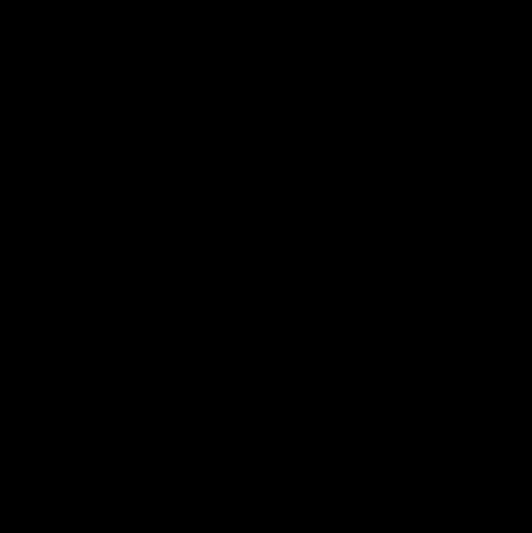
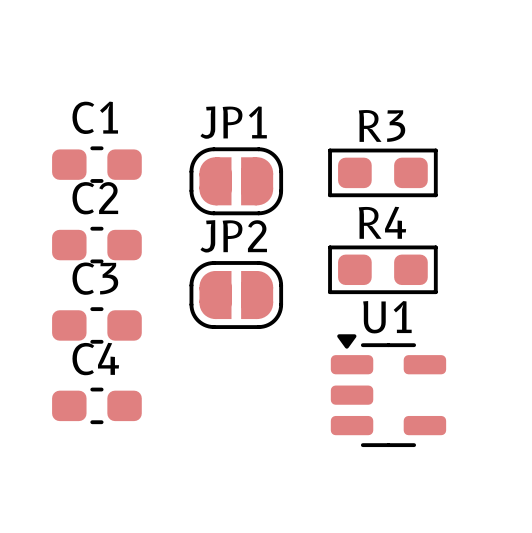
C1: none -> (96, 164)
R3: none -> (382, 172)
JP1: none -> (236, 181)
C2: none -> (96, 245)
R4: none -> (382, 269)
JP2: none -> (236, 295)
C3: none -> (96, 325)
U1: none -> (388, 390)
C4: none -> (96, 405)

